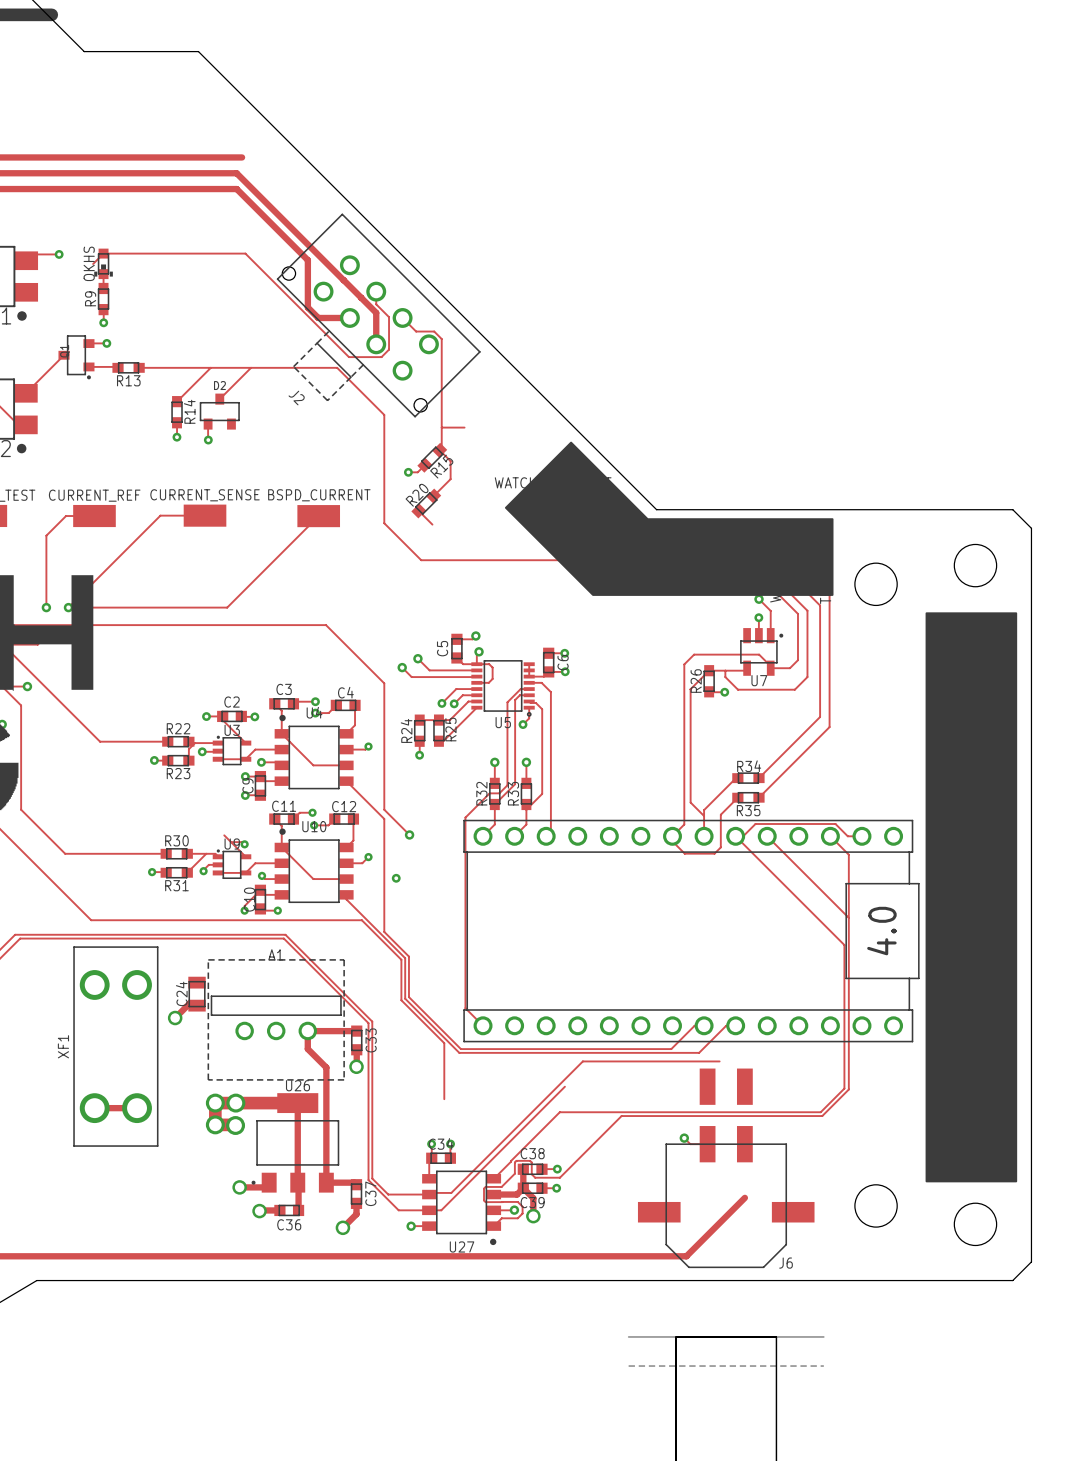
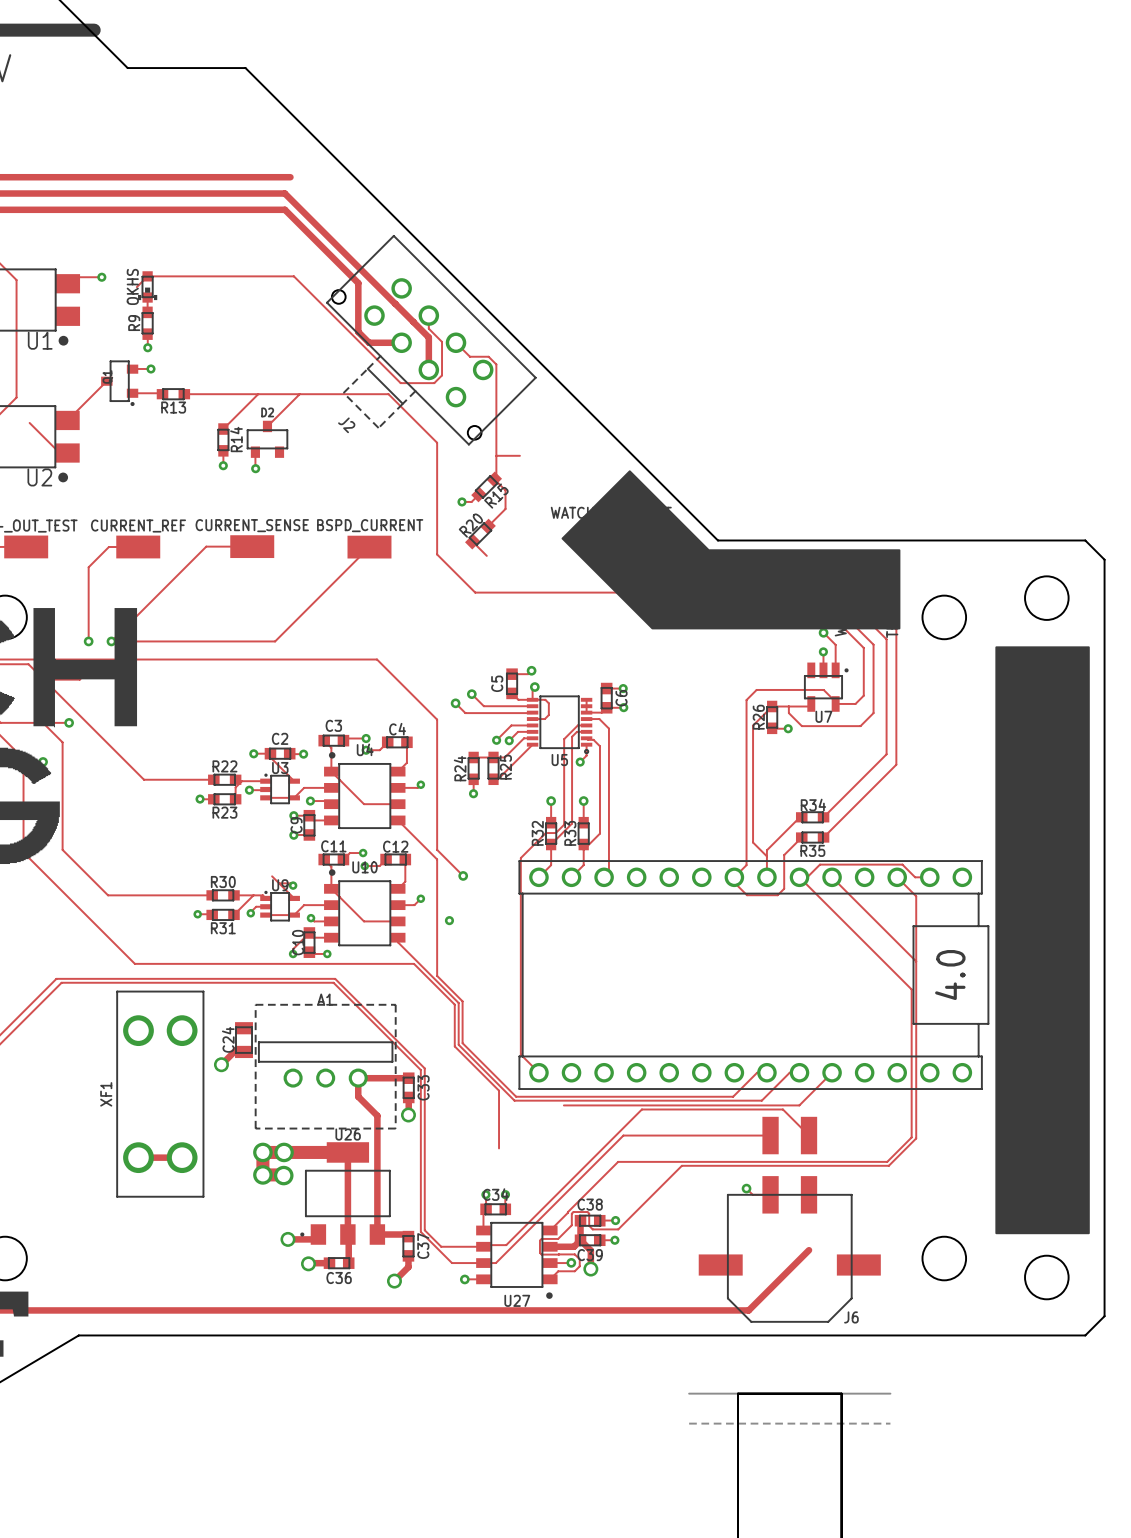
track: none -> (832, 1072) (799, 1105) (563, 1105)
track: none -> (782, 1109) (809, 1135)
track: none -> (623, 1135) (770, 1135)

